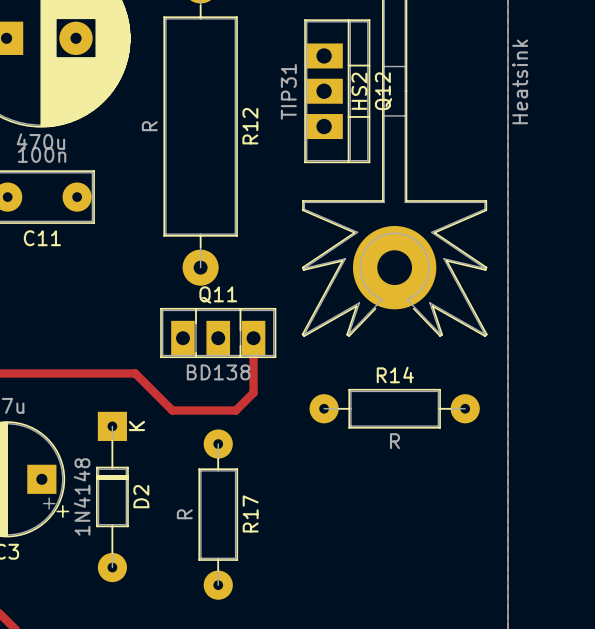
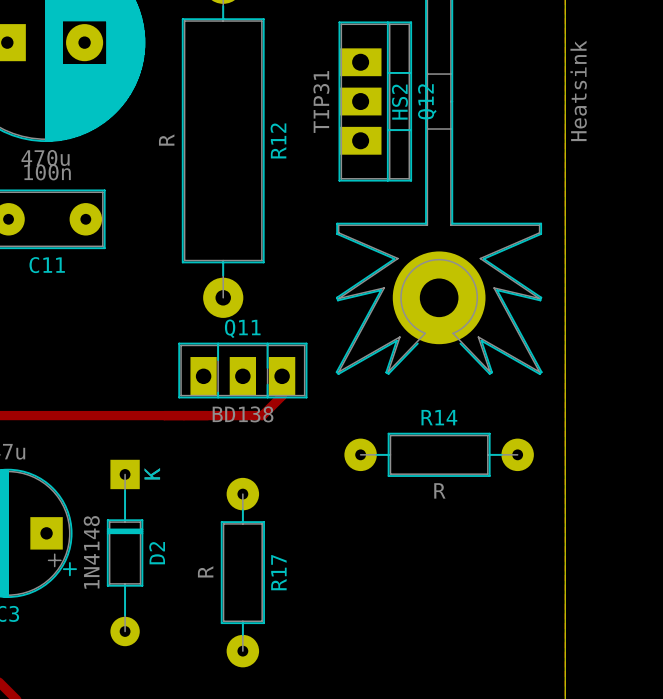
track: (253, 355) (253, 392) (235, 410) (172, 410) (135, 373) -> (282, 395) (262, 415) (150, 415)
D2 footprint: [96, 411, 129, 583] -> [106, 459, 144, 647]

